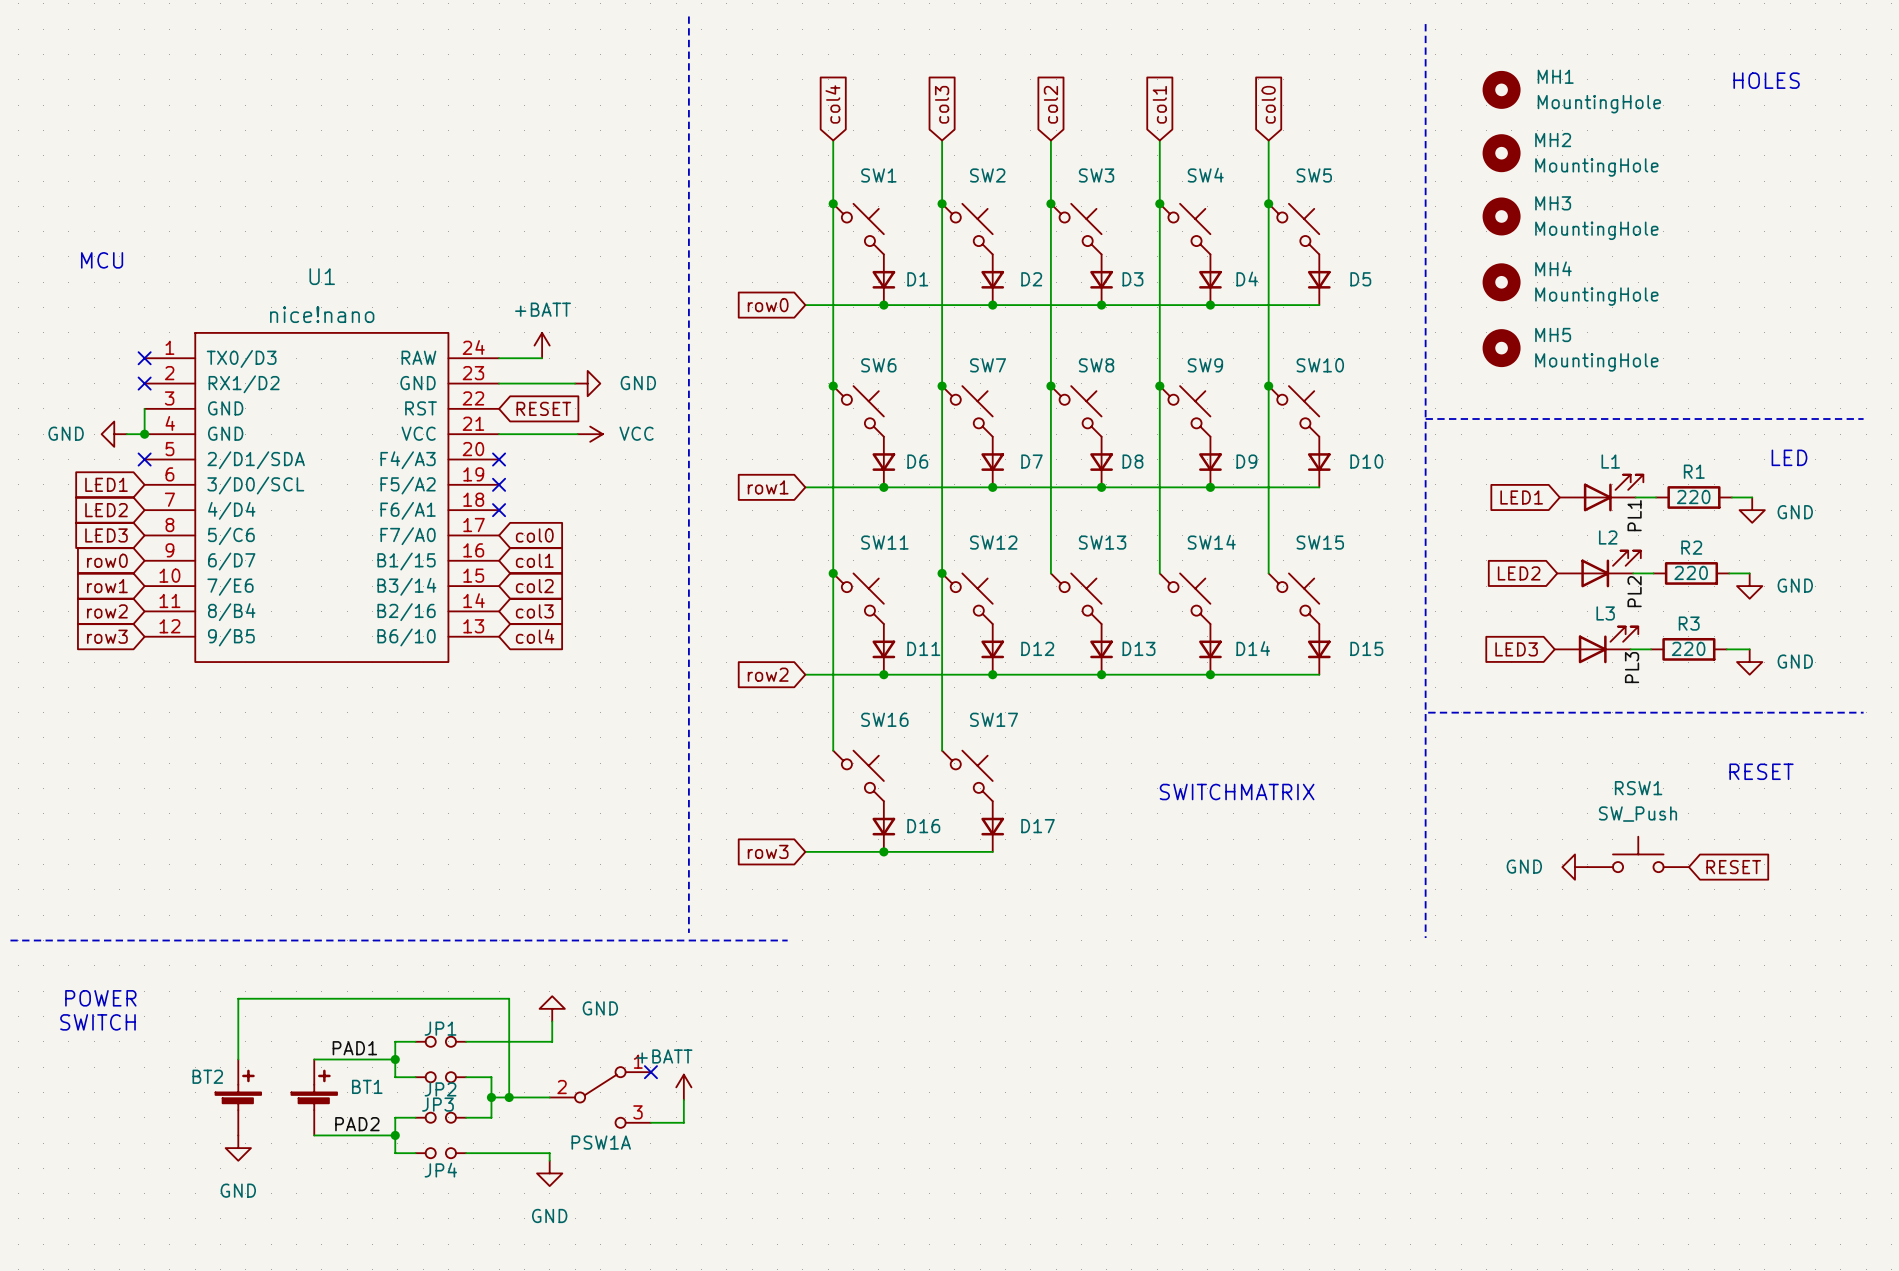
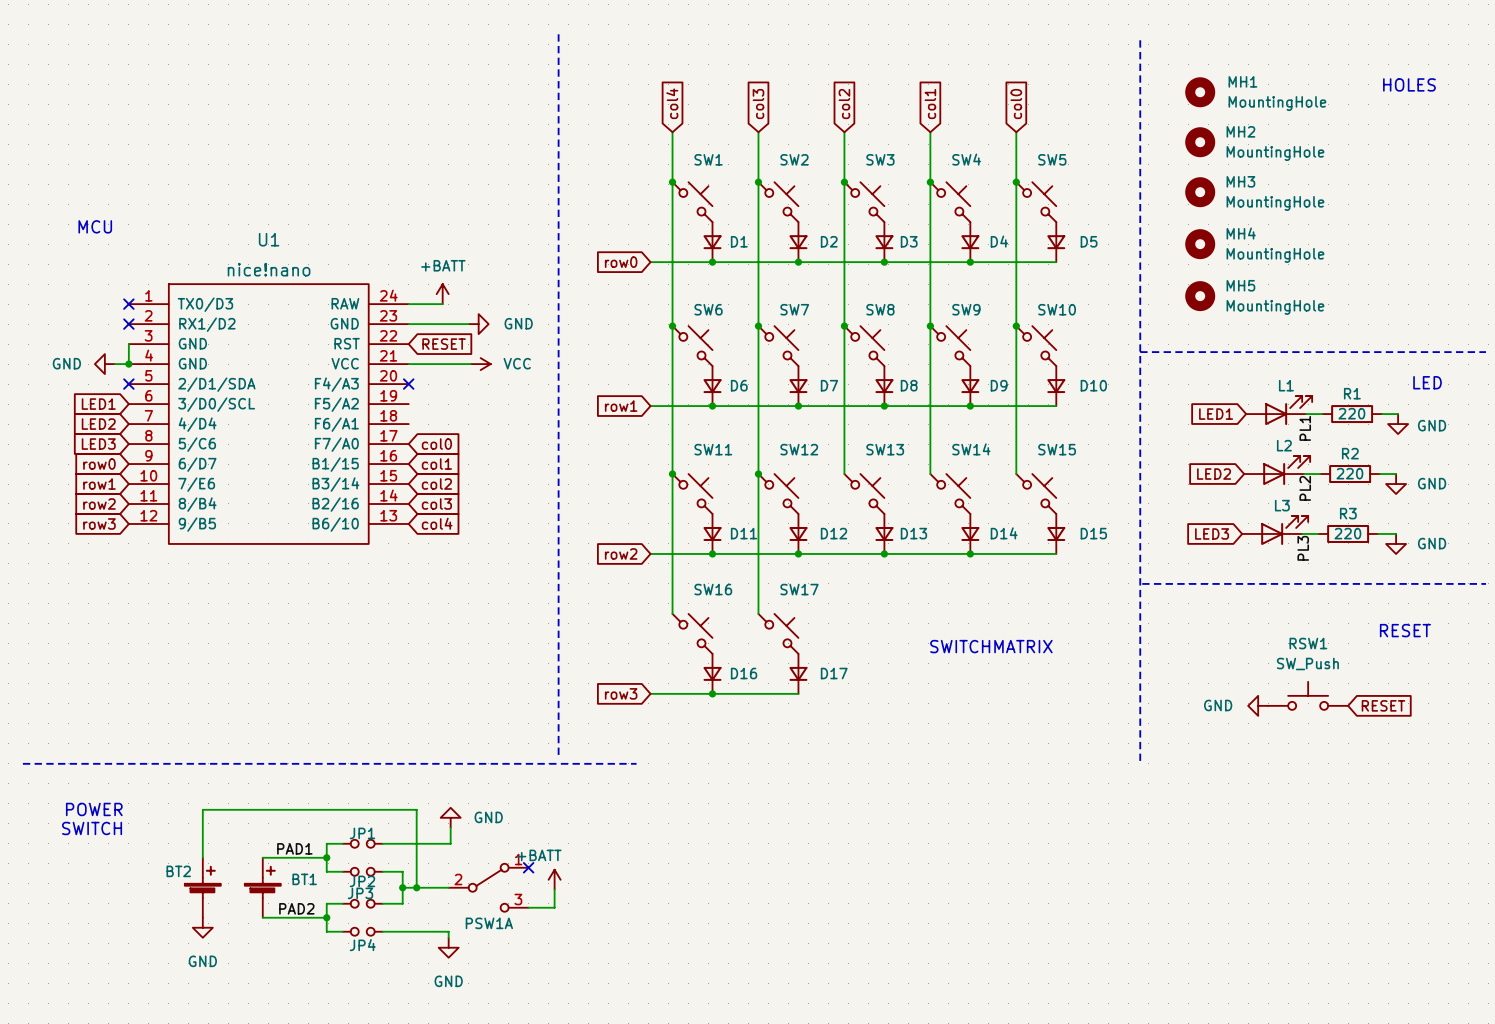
no-connect mark: (499, 484) -> none
no-connect mark: (499, 510) -> none

